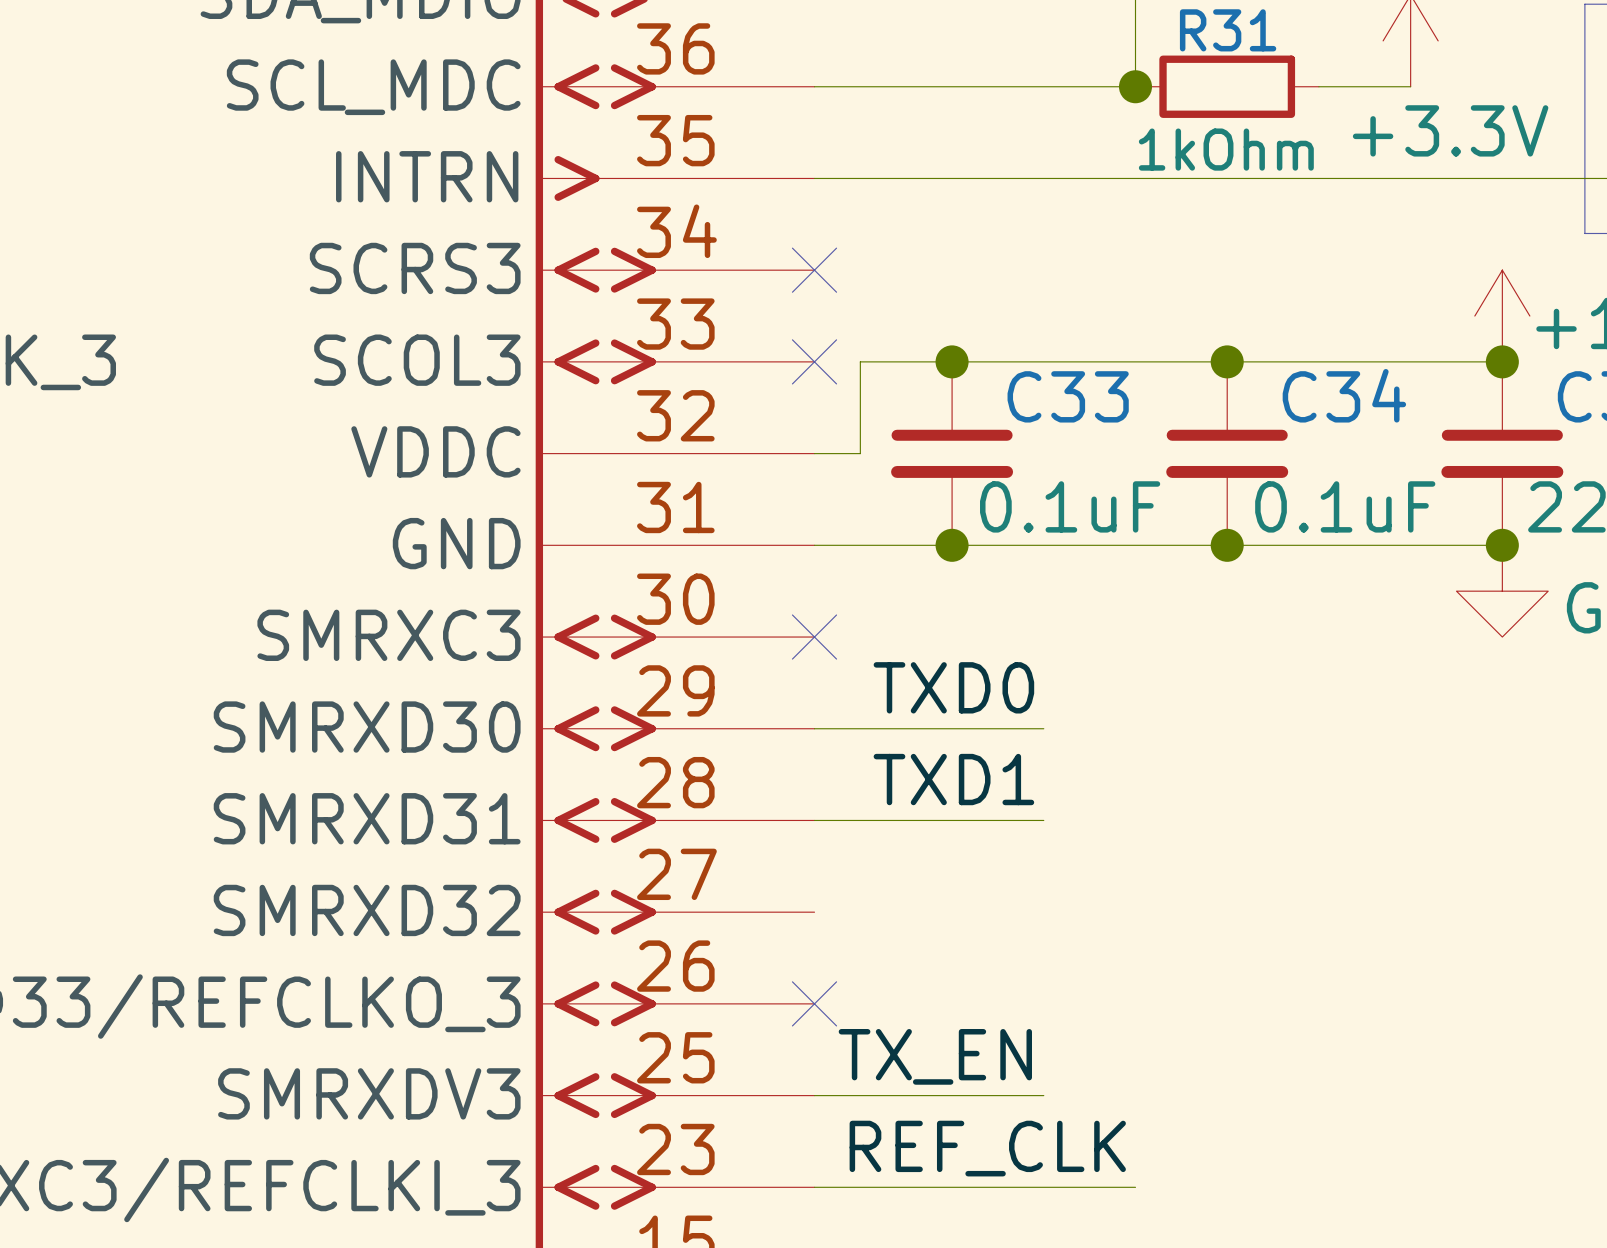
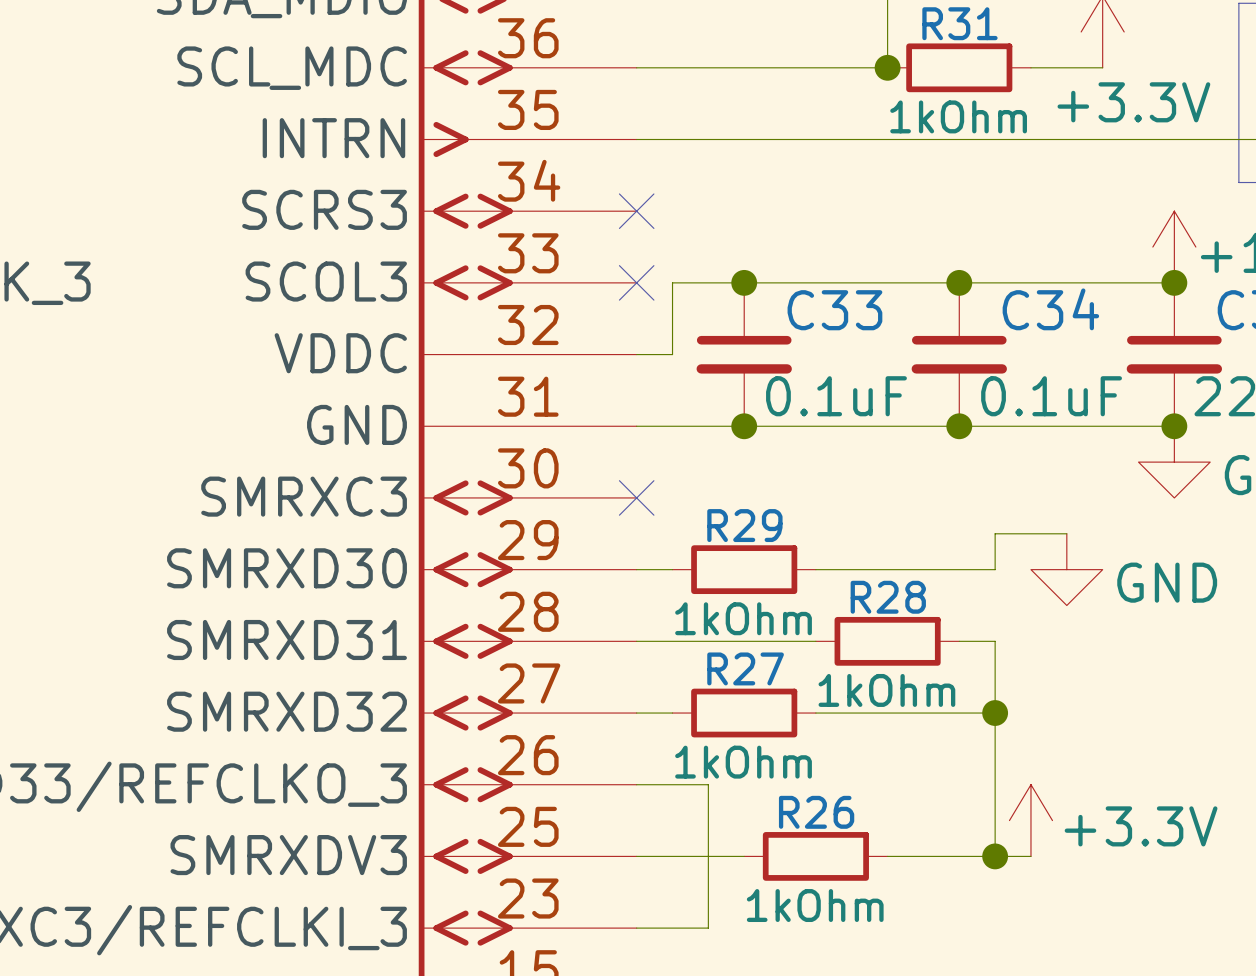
label: TXD0 (953, 687) -> none
wire: (860, 728) (1043, 728) -> (1066, 533) (995, 533) (995, 569) (815, 569)
R29: none -> 1kOhm (744, 569)
power symbol: none -> GND (1066, 569)
label: TXD1 (953, 779) -> none
R28: none -> 1kOhm (887, 641)
wire: none -> (959, 641) (995, 641) (995, 856)
wire: none -> (636, 713) (672, 713)
R27: none -> 1kOhm (744, 713)
wire: none -> (815, 713) (995, 713)
junction: none -> (995, 713)
no-connect mark: (814, 1003) -> none
power symbol: none -> +3.3V (1030, 820)
label: TX_EN (935, 1056) -> none
wire: (952, 1095) (1043, 1095) -> none
R26: none -> 1kOhm (815, 856)
wire: none -> (887, 856) (1030, 856)
junction: none -> (995, 856)
label: REF_CLK (987, 1148) -> none
wire: (906, 1187) (1135, 1187) -> (708, 928) (708, 784) (636, 784)

